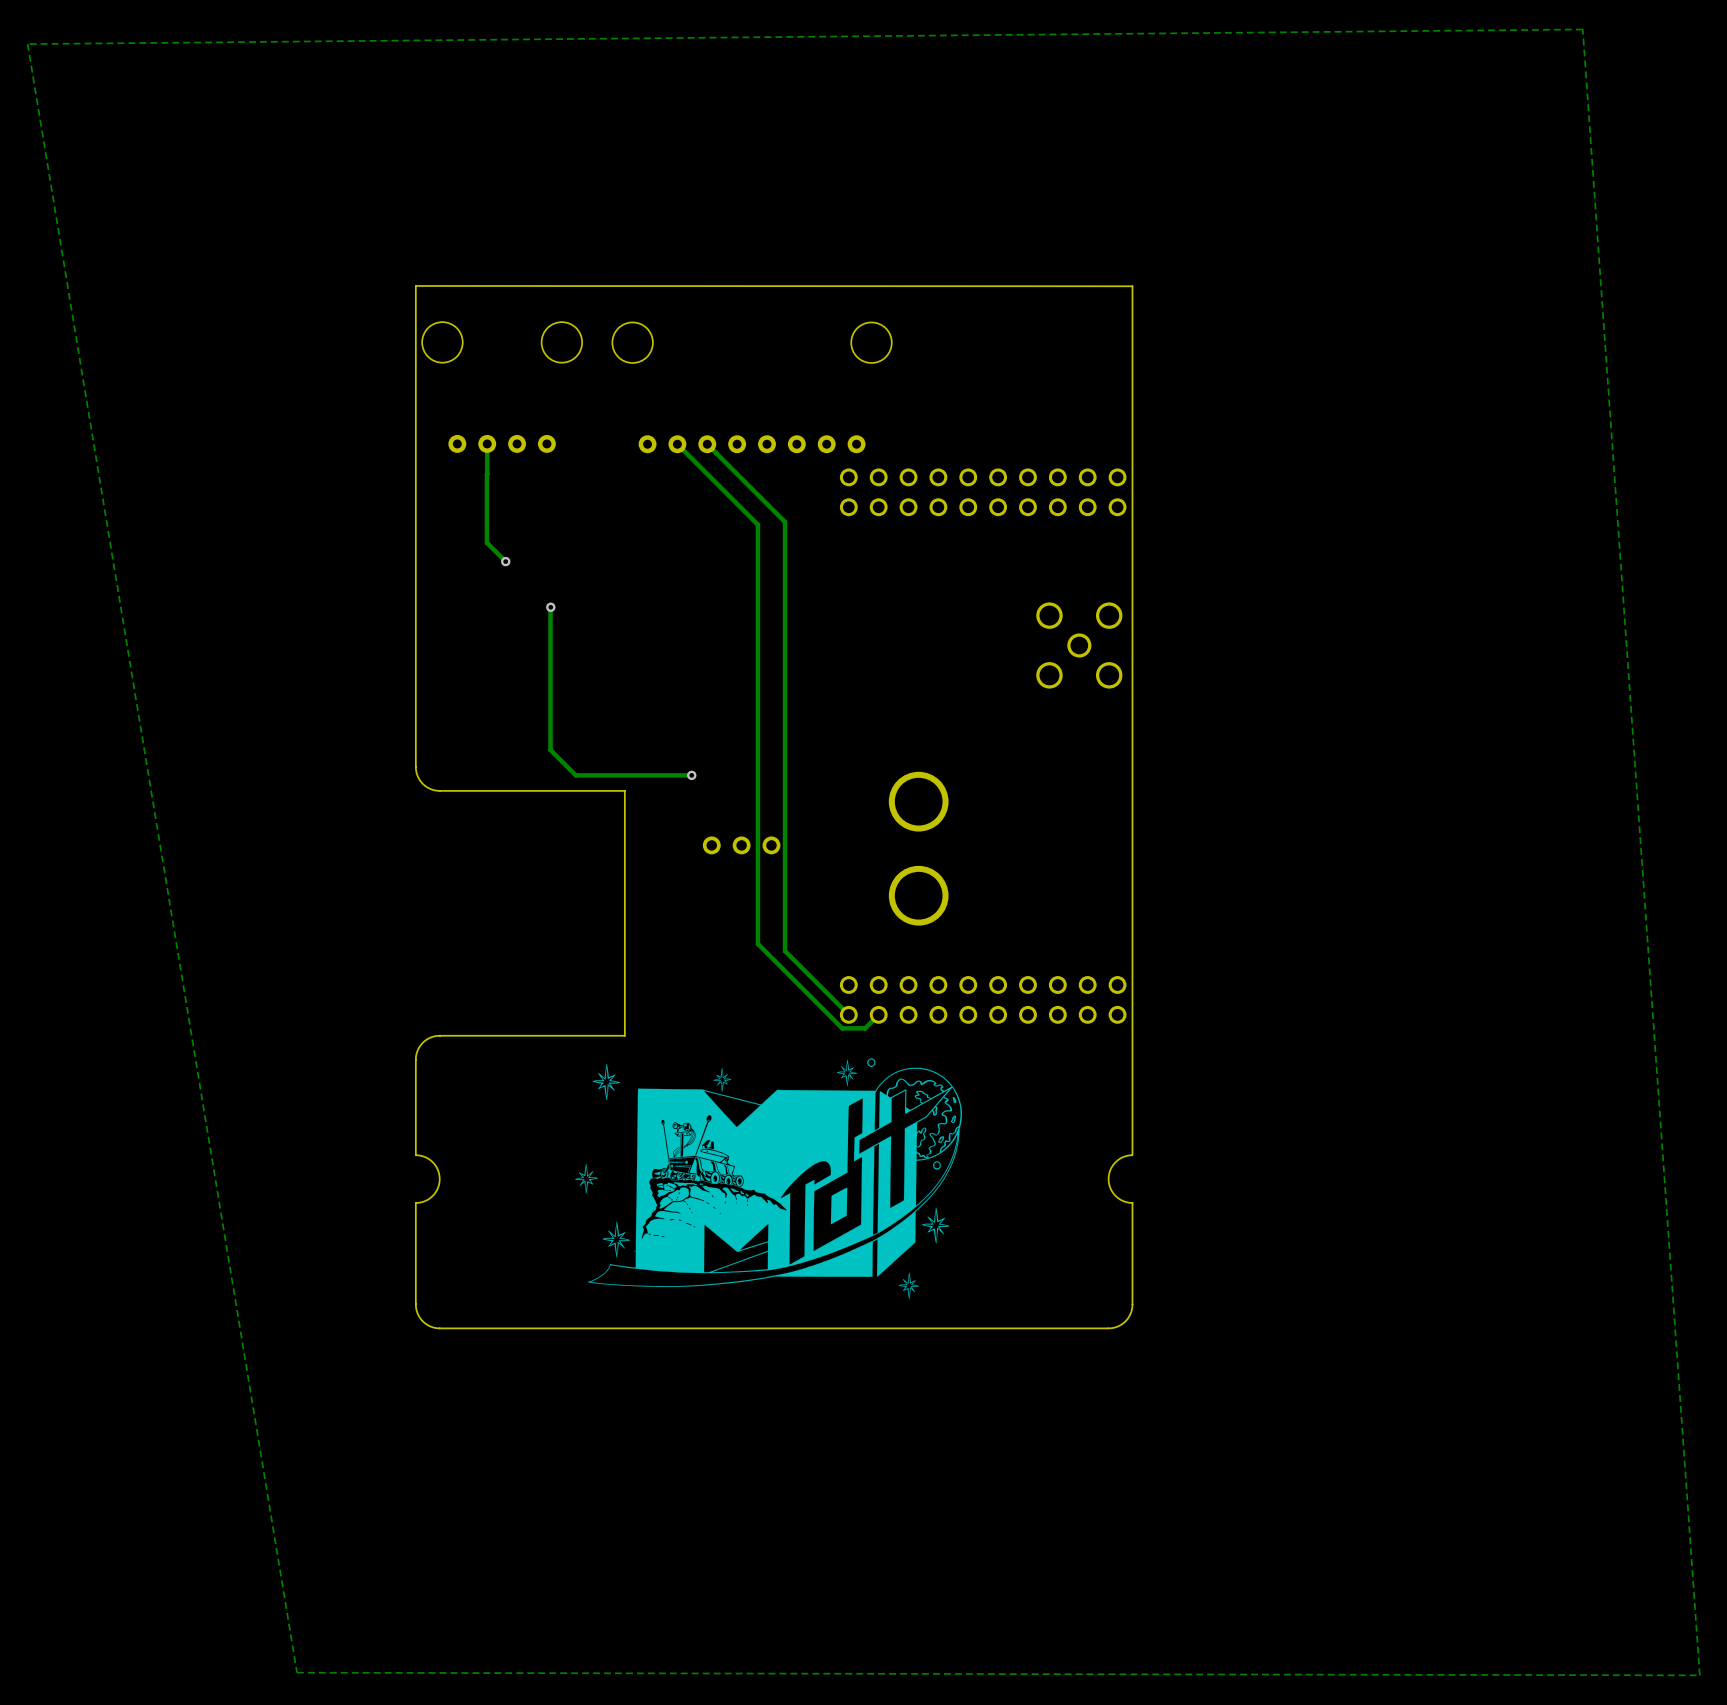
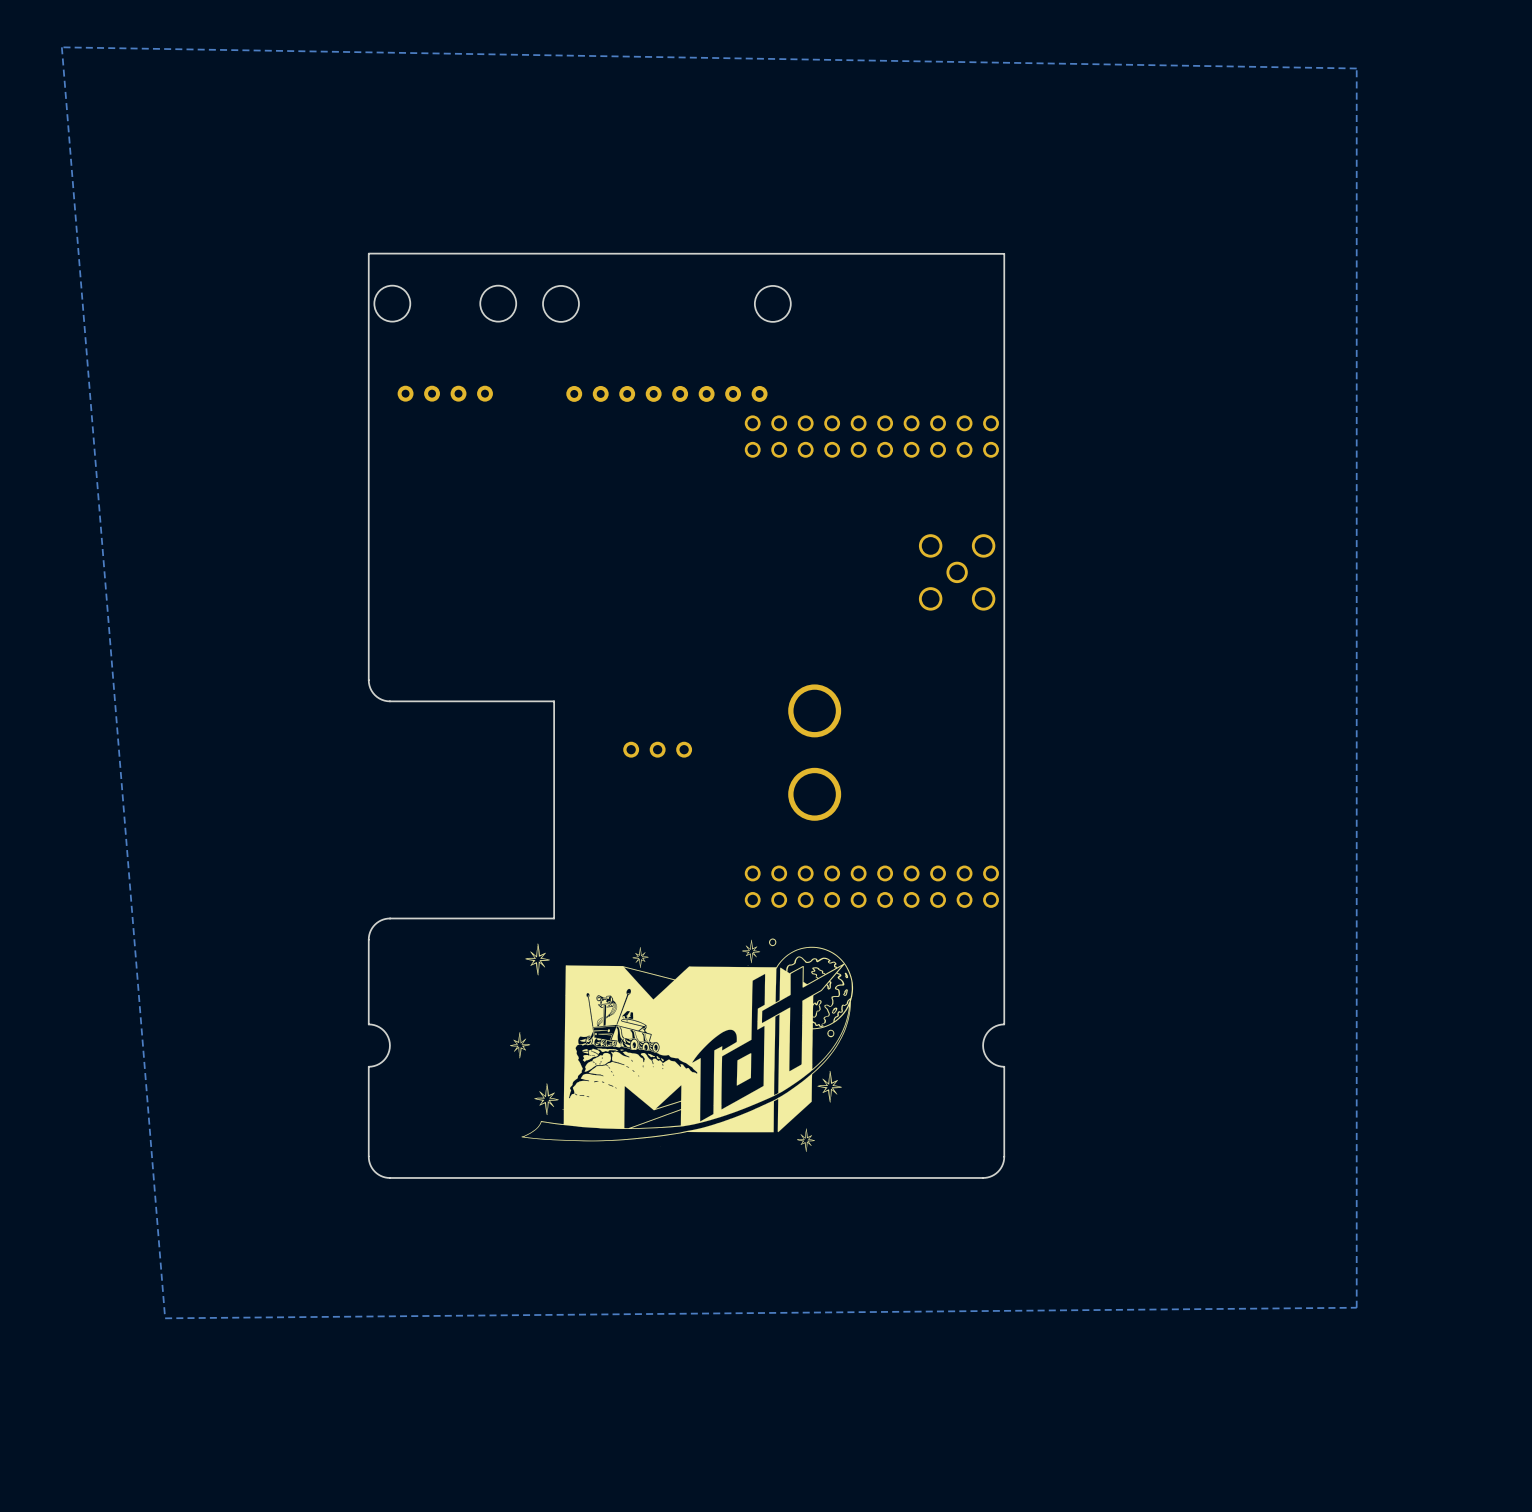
zone outline: (1582, 29) (27, 44) (297, 1672) (1699, 1675) (1582, 29) -> (61, 47) (1356, 68) (1356, 1307) (165, 1318) (61, 47)
track: (487, 443) (486, 542) (505, 561) -> none
track: (677, 444) (757, 524) (757, 943) (842, 1028) (865, 1028) (878, 1014) -> none
track: (707, 444) (785, 521) (785, 951) (848, 1014) -> none
via: (505, 561) -> none
track: (550, 607) (550, 750) (575, 775) (691, 775) -> none
via: (550, 607) -> none
via: (691, 775) -> none

